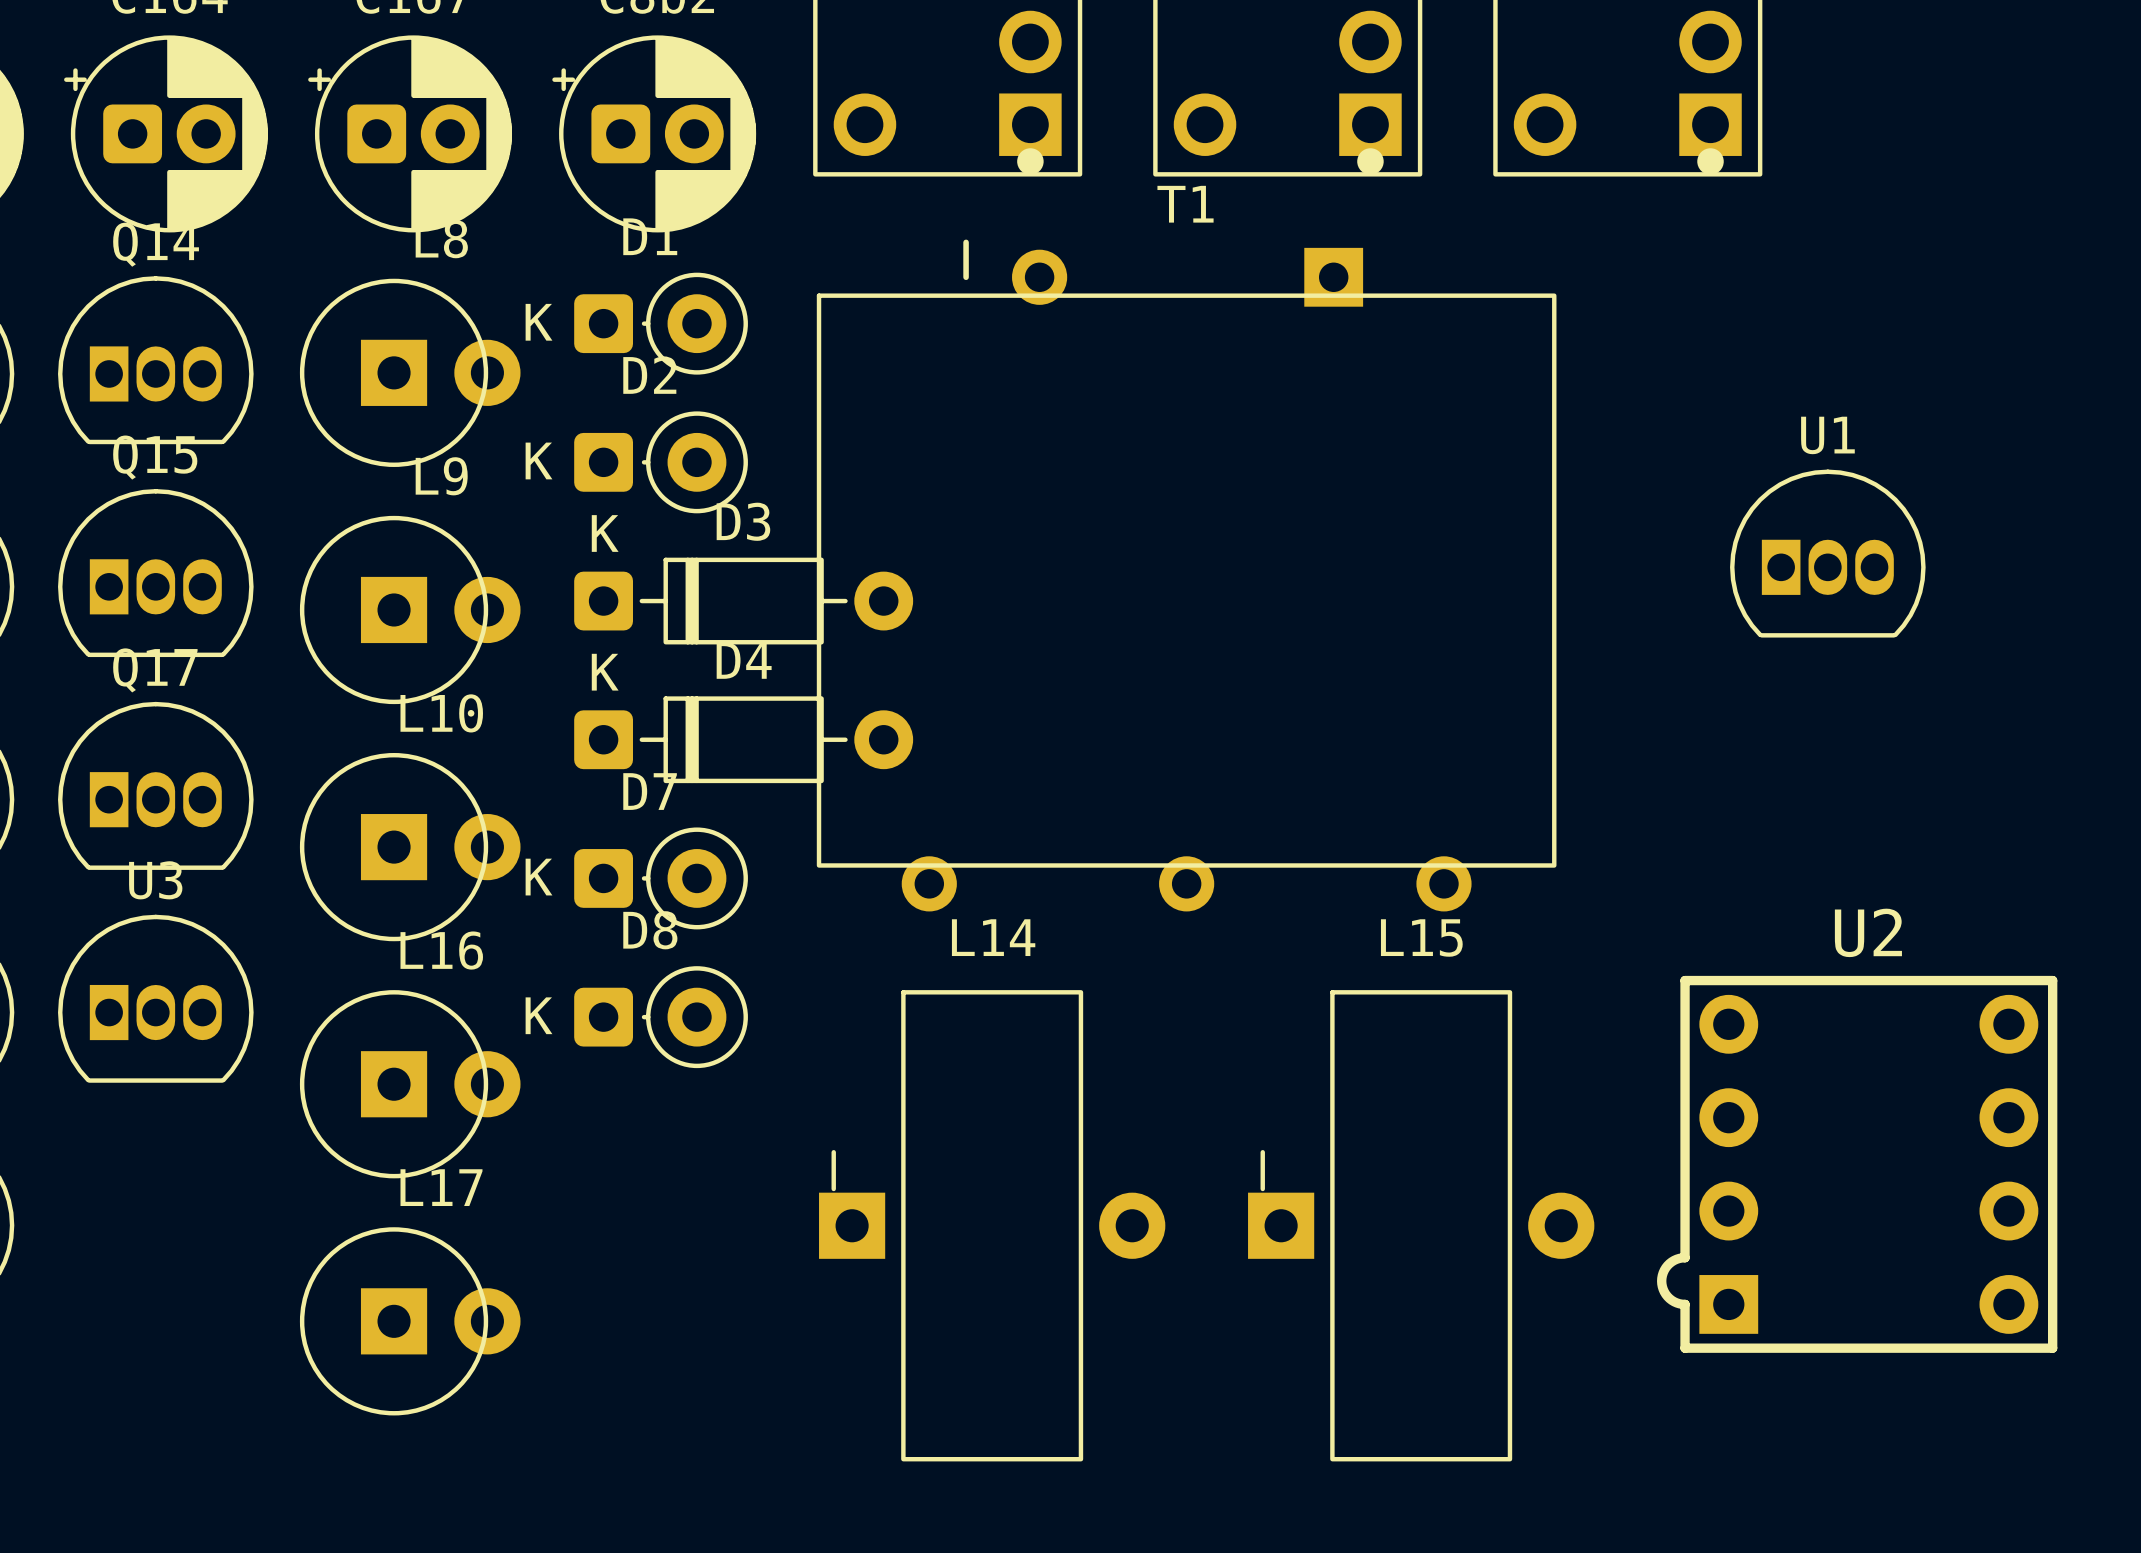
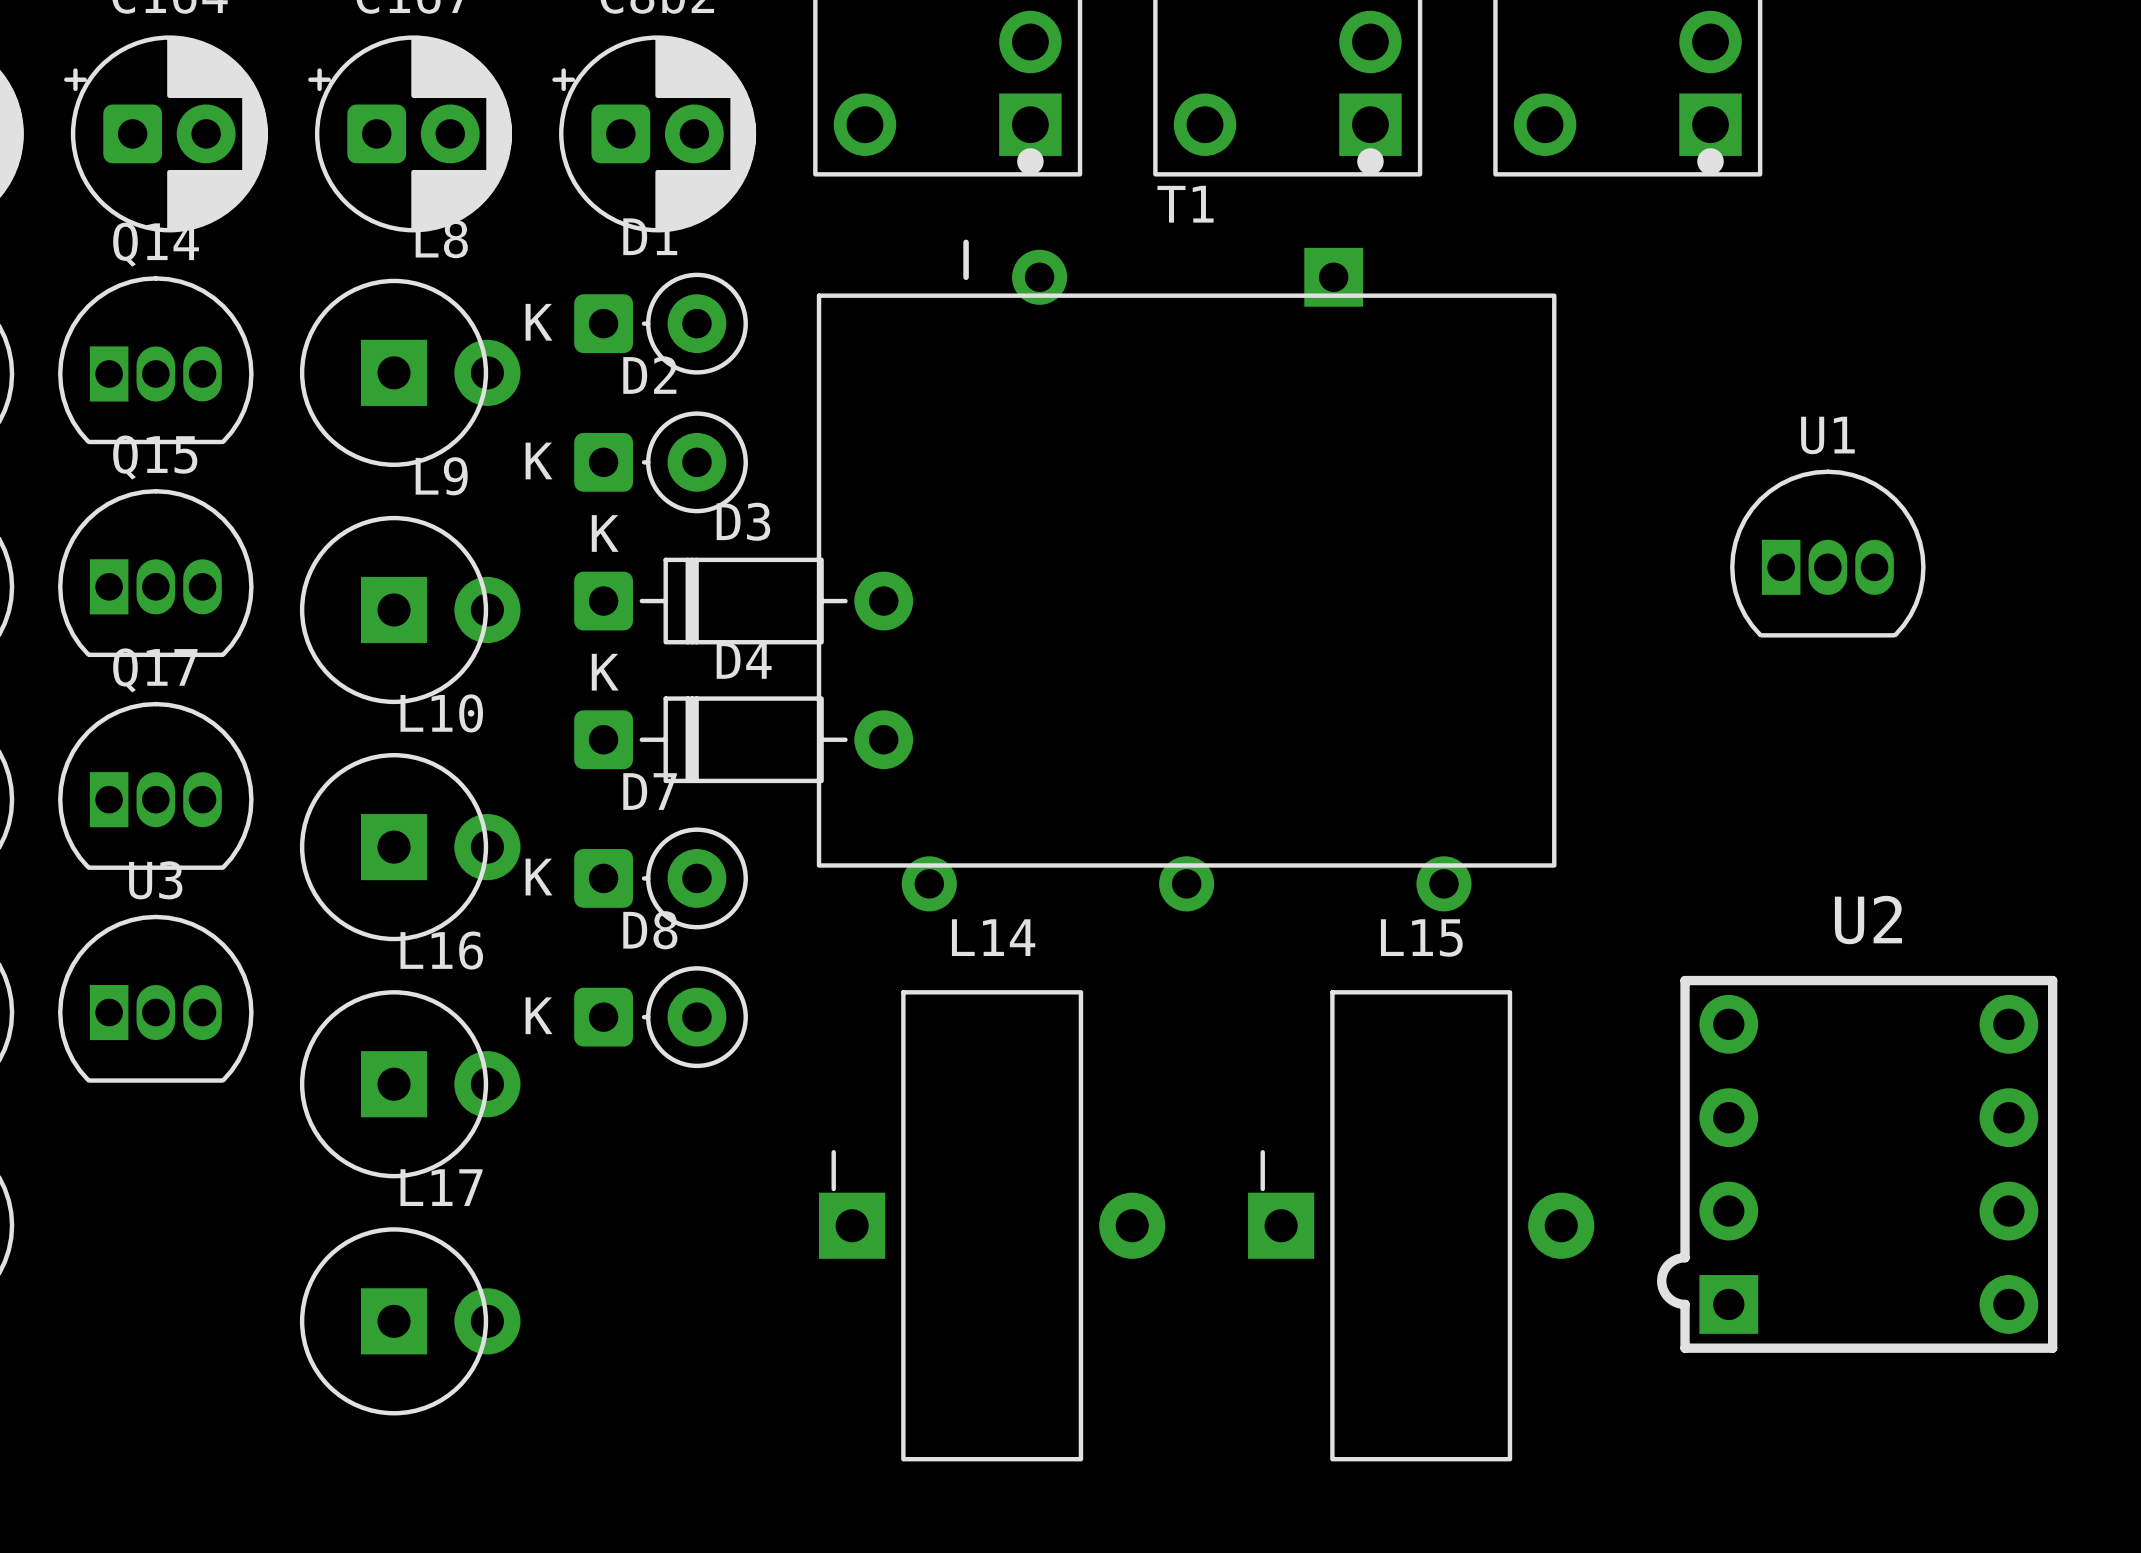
U2 name position: U2 (1868, 932) -> U2 (1868, 920)

